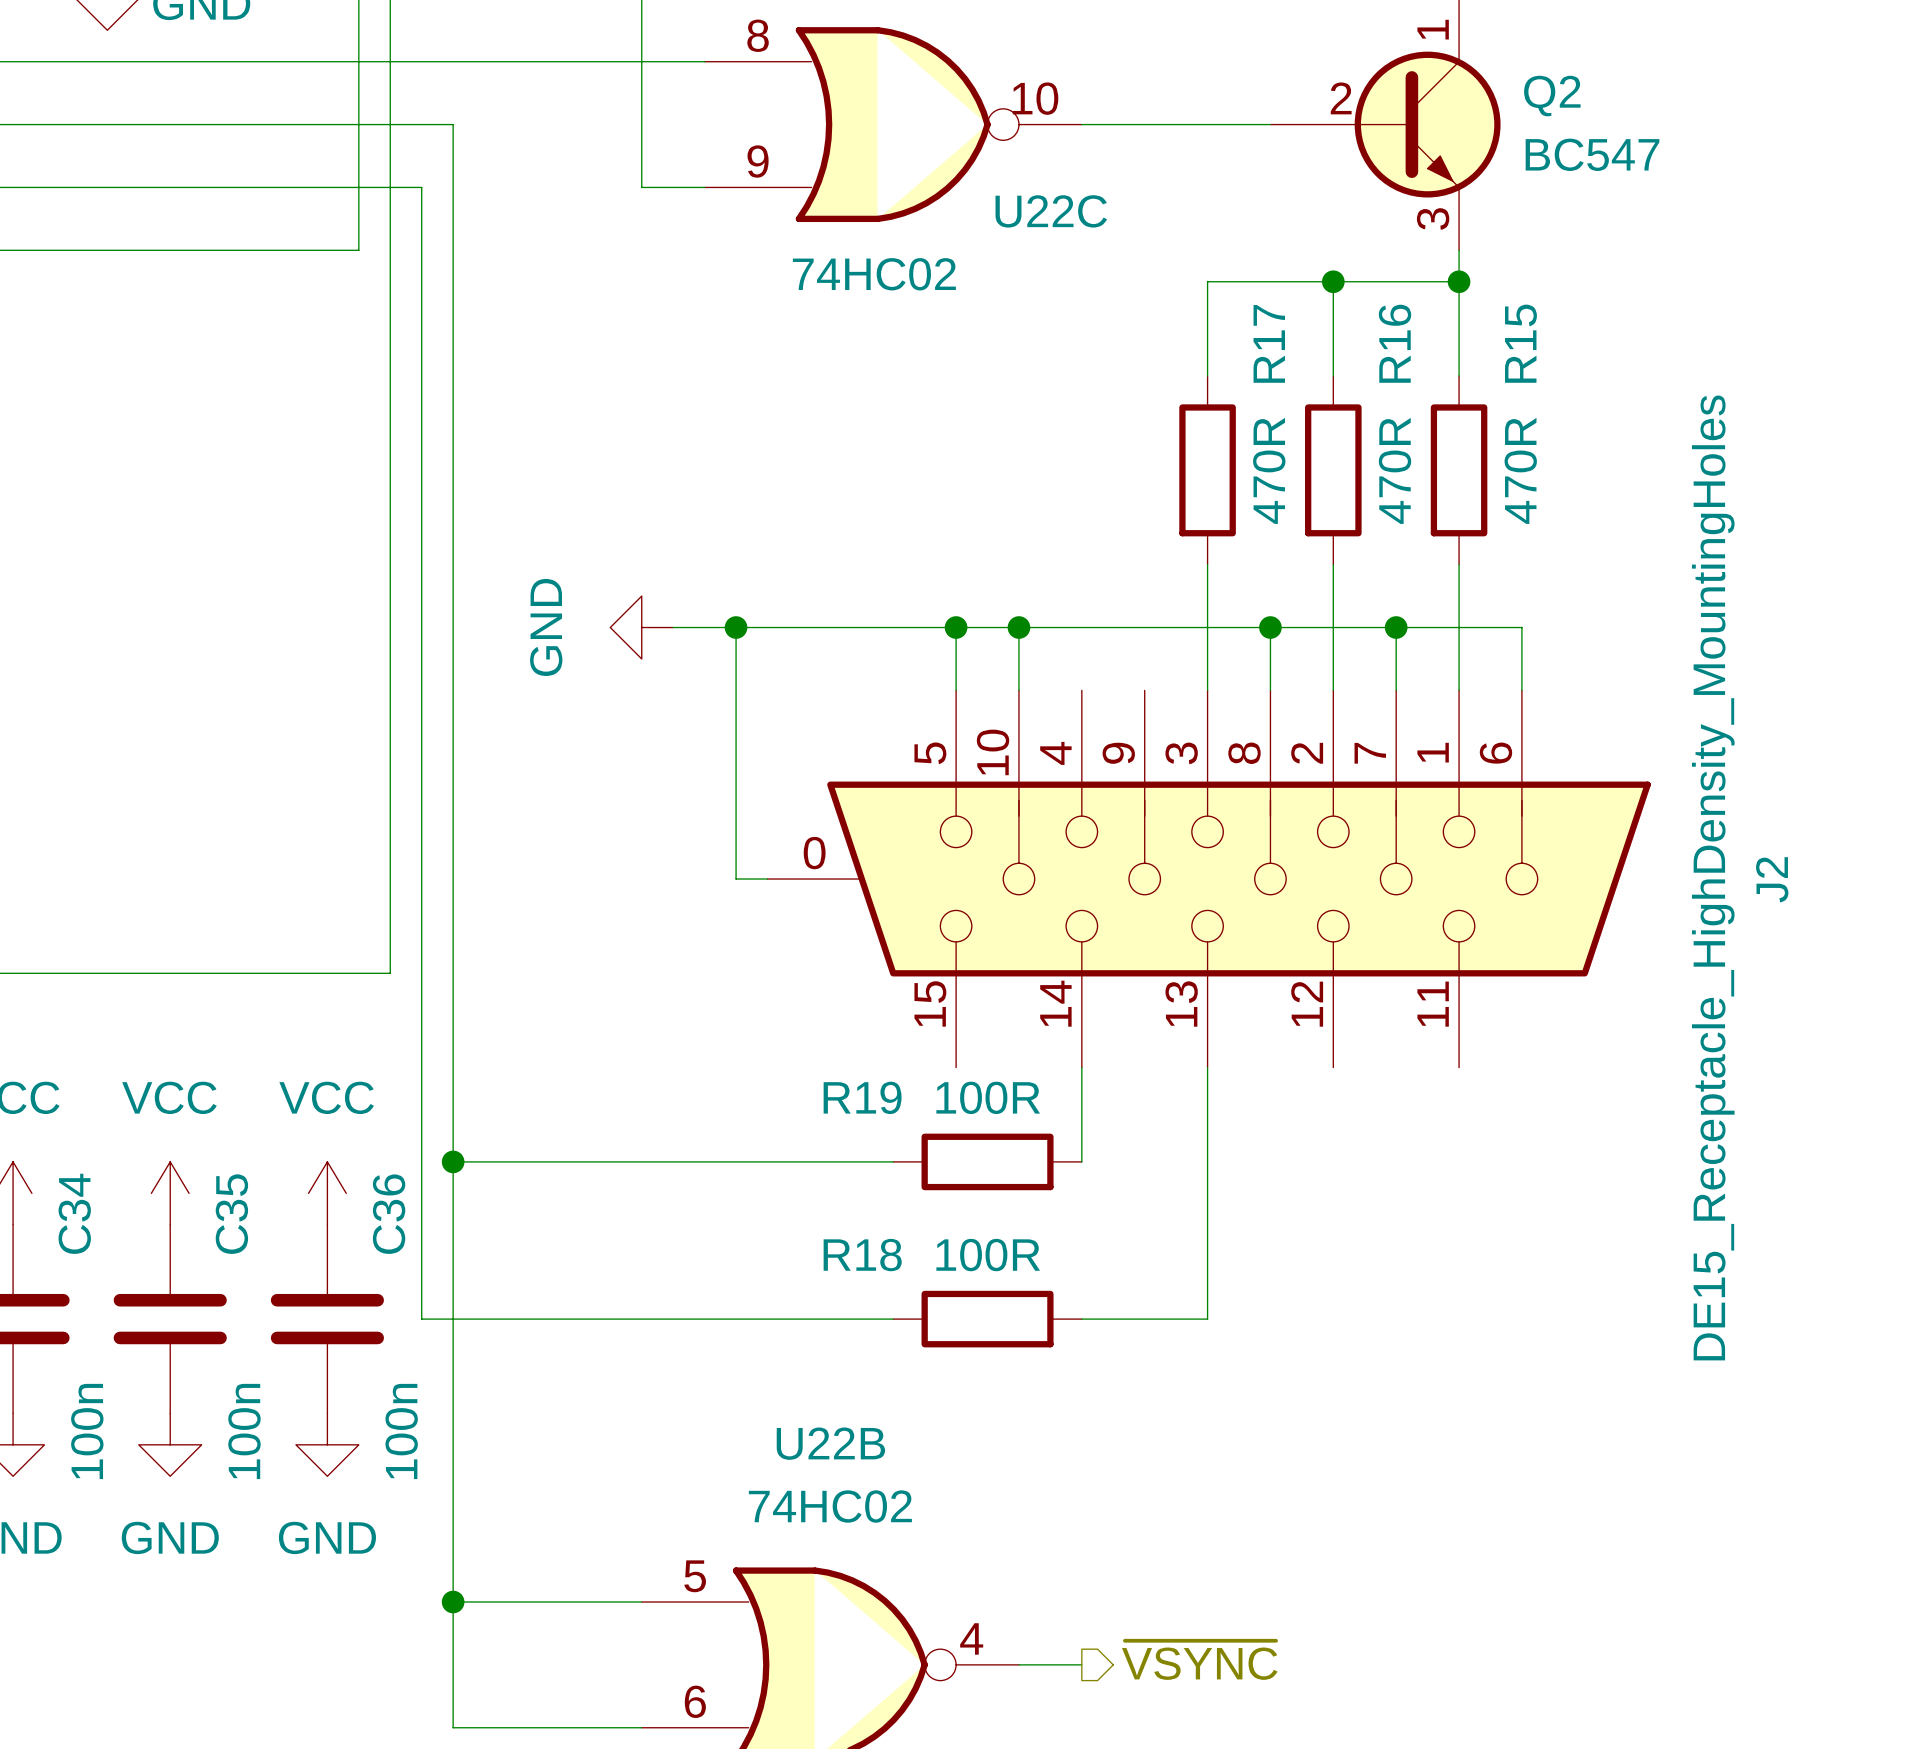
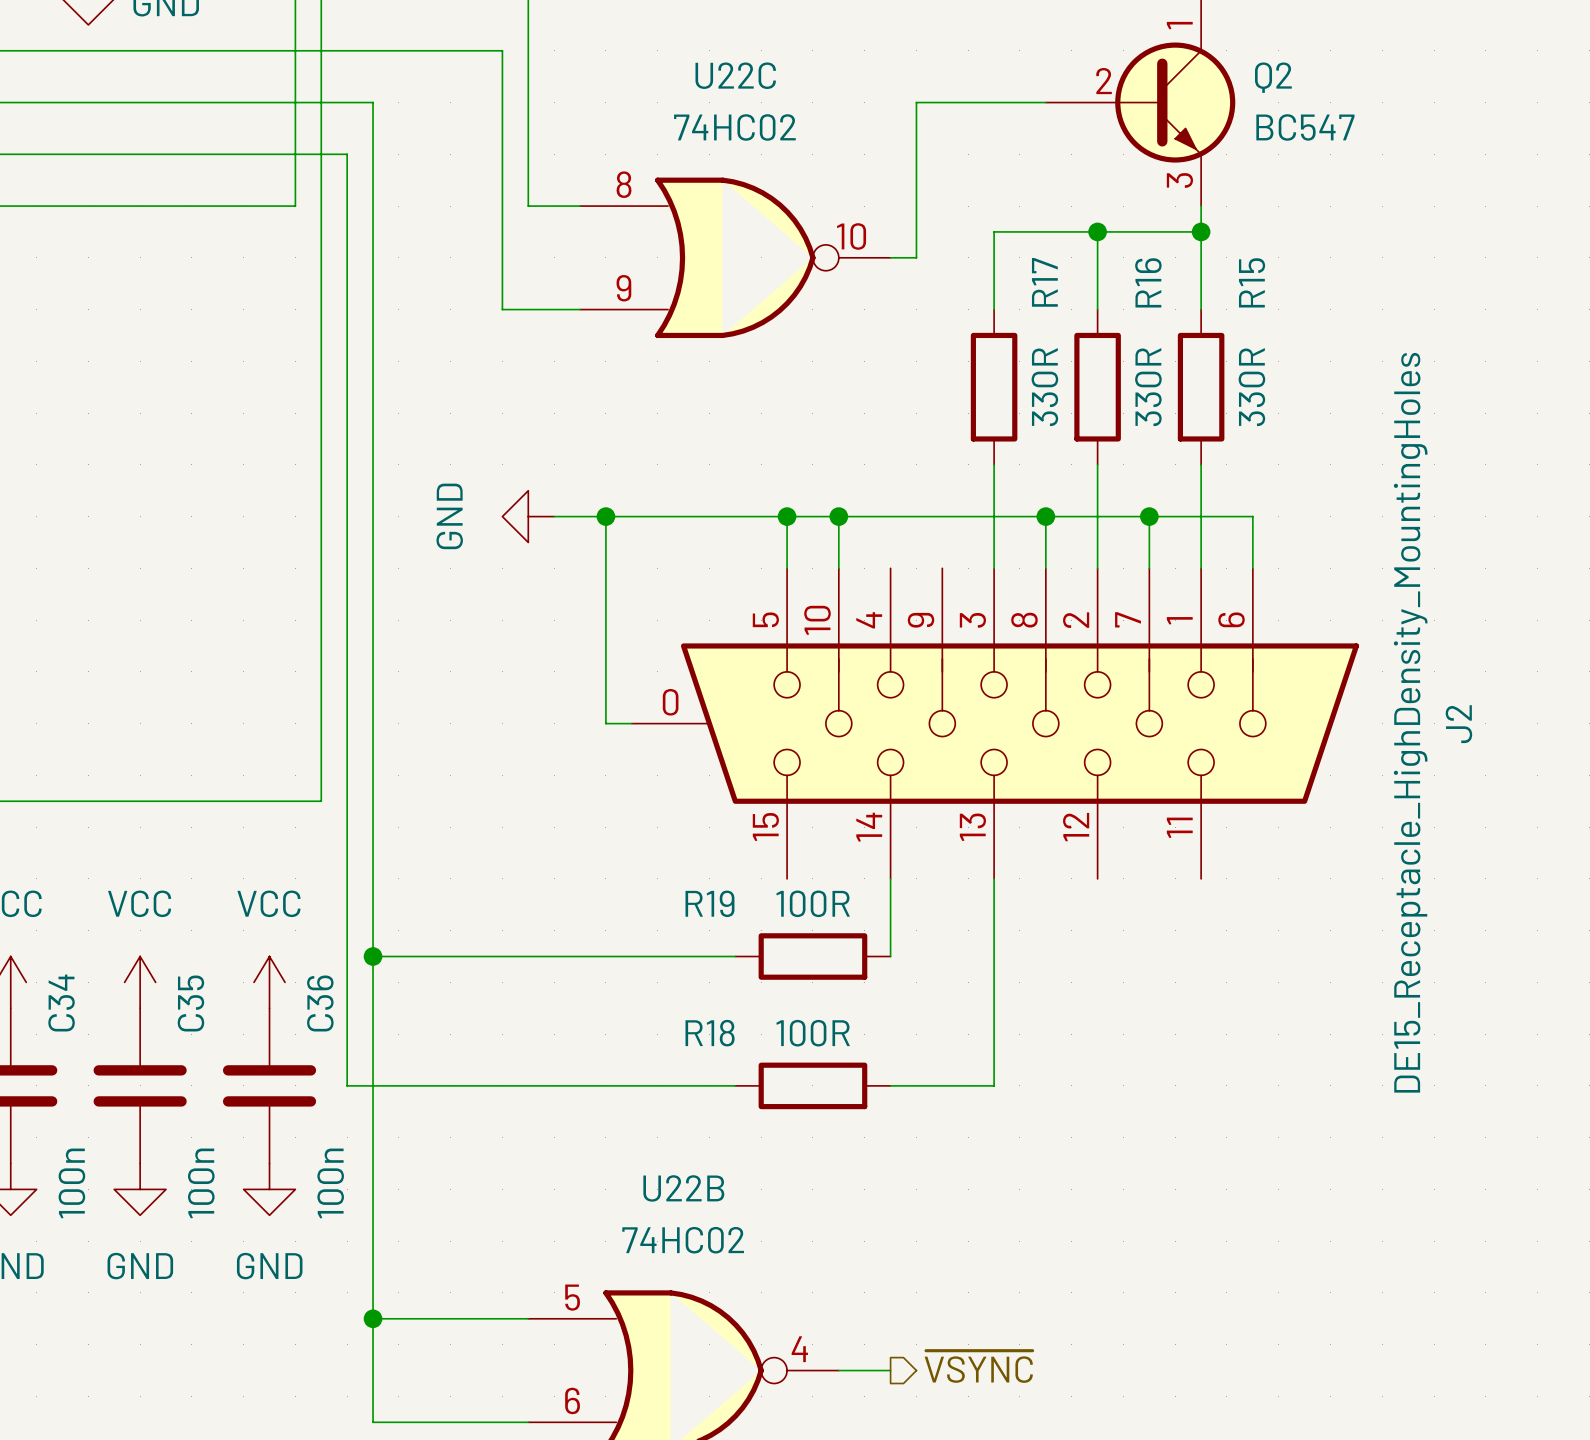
wire: (610, 61) (704, 61) -> (502, 50) (502, 309) (580, 309)
U22C position: (893, 124) -> (735, 257)
wire: (1081, 124) (1113, 124) -> (890, 257) (916, 257) (916, 102)
wire: (641, 187) (704, 187) -> (528, 154) (528, 206) (580, 206)
U22C name position: U22C (1051, 211) -> U22C (735, 75)
U22C value position: 74HC02 (874, 274) -> 74HC02 (734, 127)
R17 value: 470R (1269, 470) -> 330R (1044, 387)
R16 value: 470R (1395, 470) -> 330R (1148, 387)
R15 value: 470R (1520, 470) -> 330R (1251, 387)

